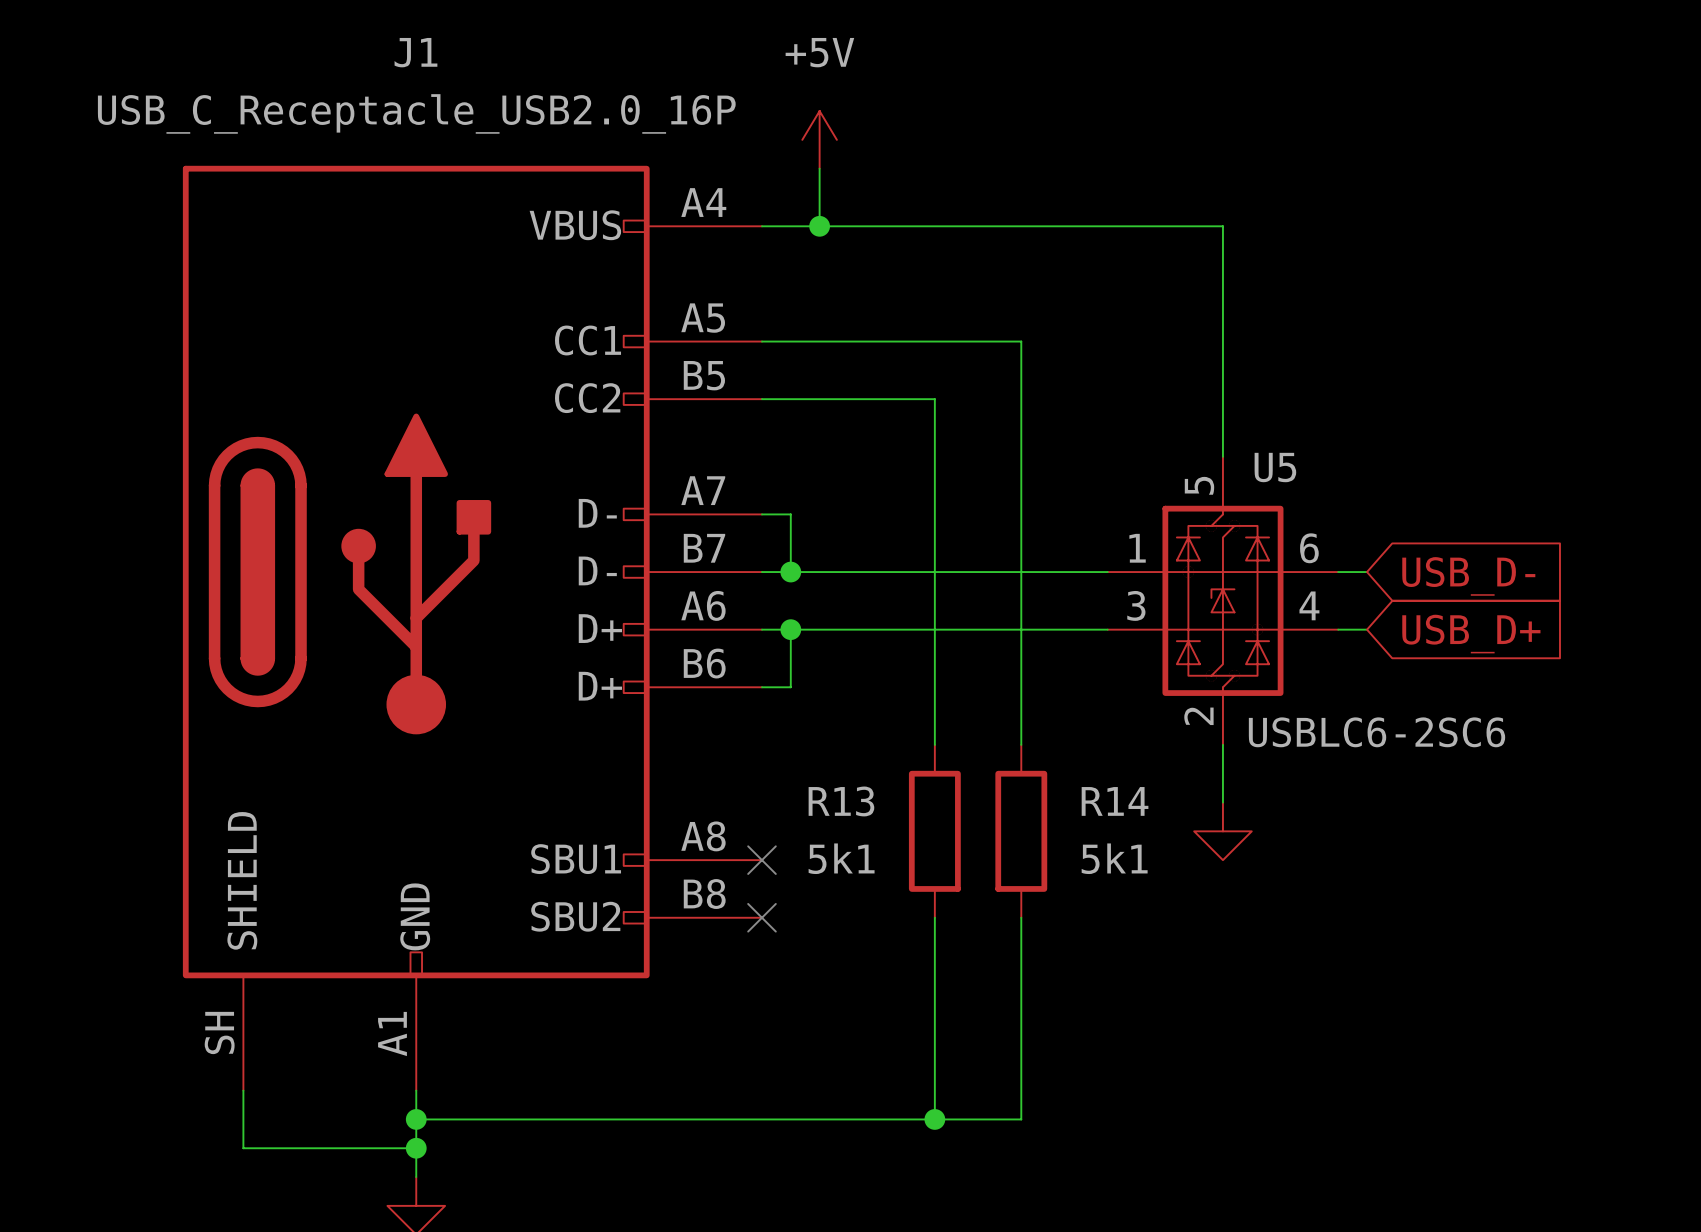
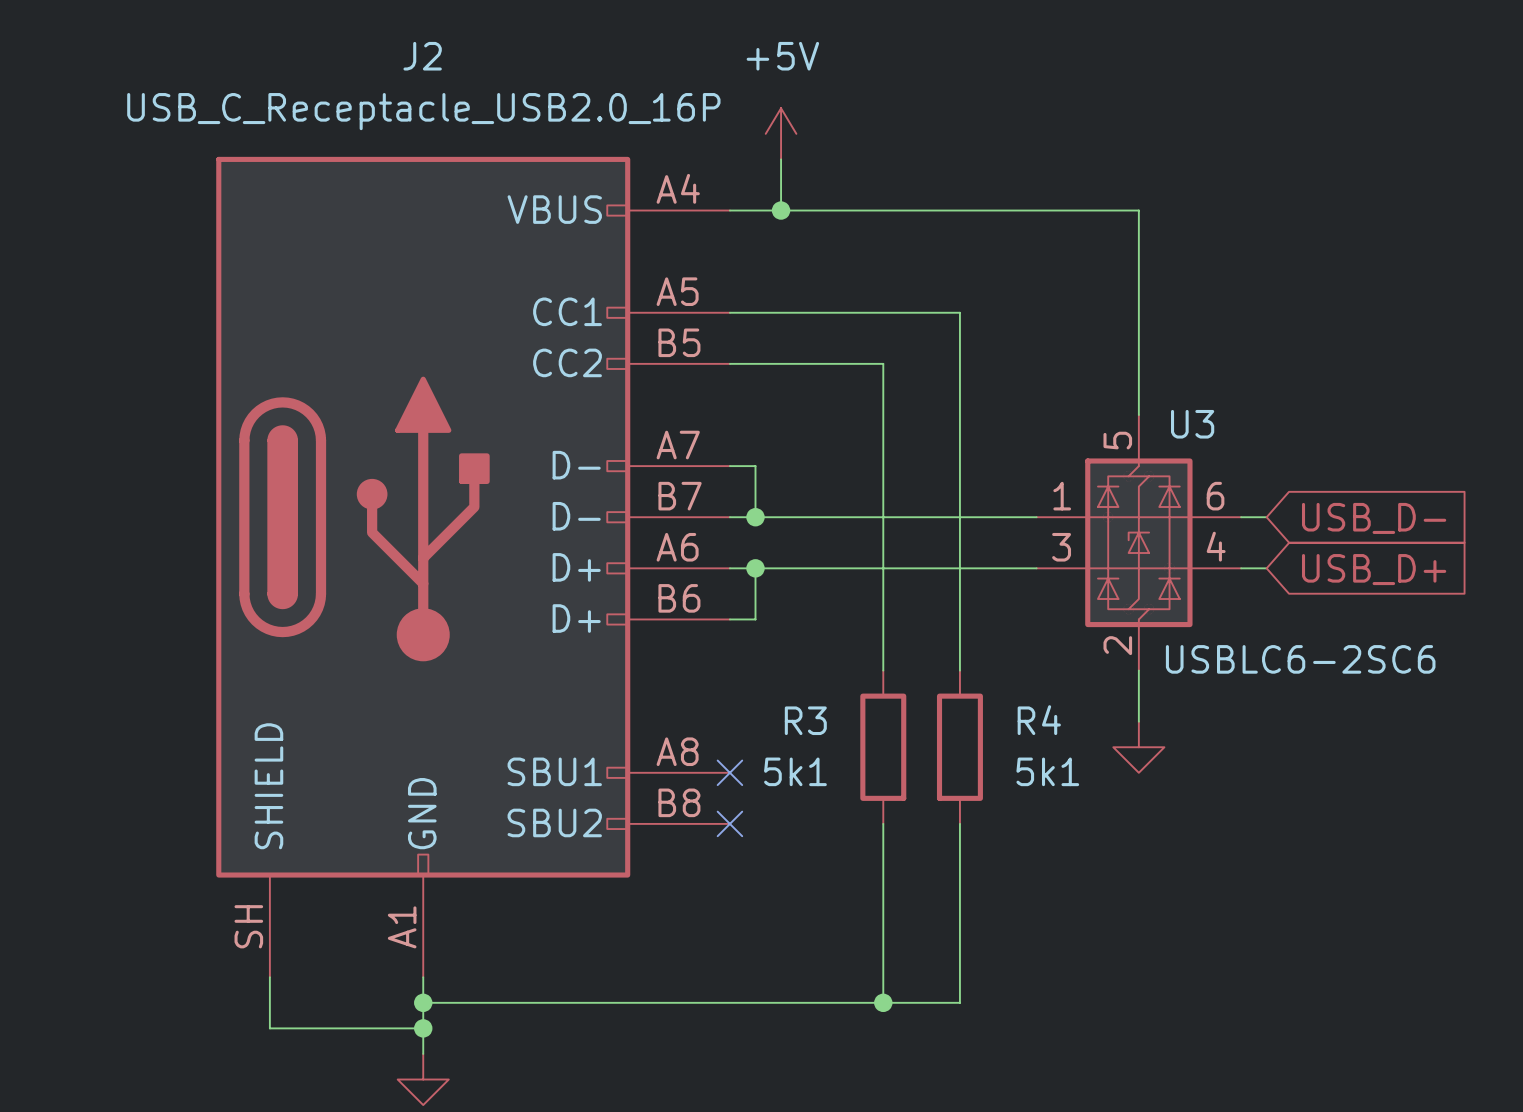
J1 name: J1 (415, 52) -> J2 (422, 56)
U5 name: U5 (1275, 467) -> U3 (1192, 424)
R13 name: R13 (841, 801) -> R3 (805, 720)
R14 name: R14 (1115, 801) -> R4 (1039, 720)

